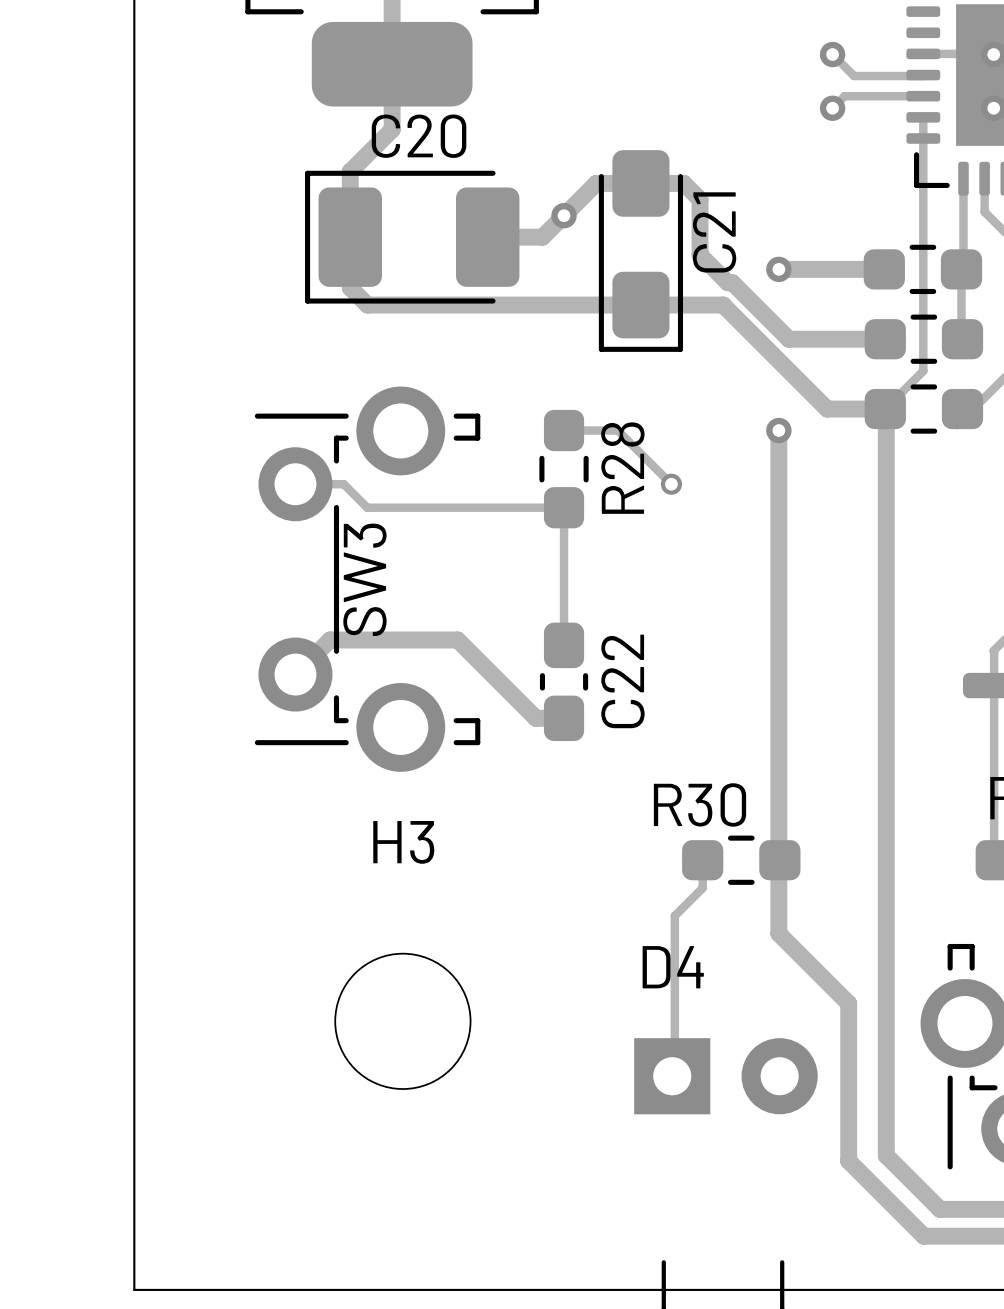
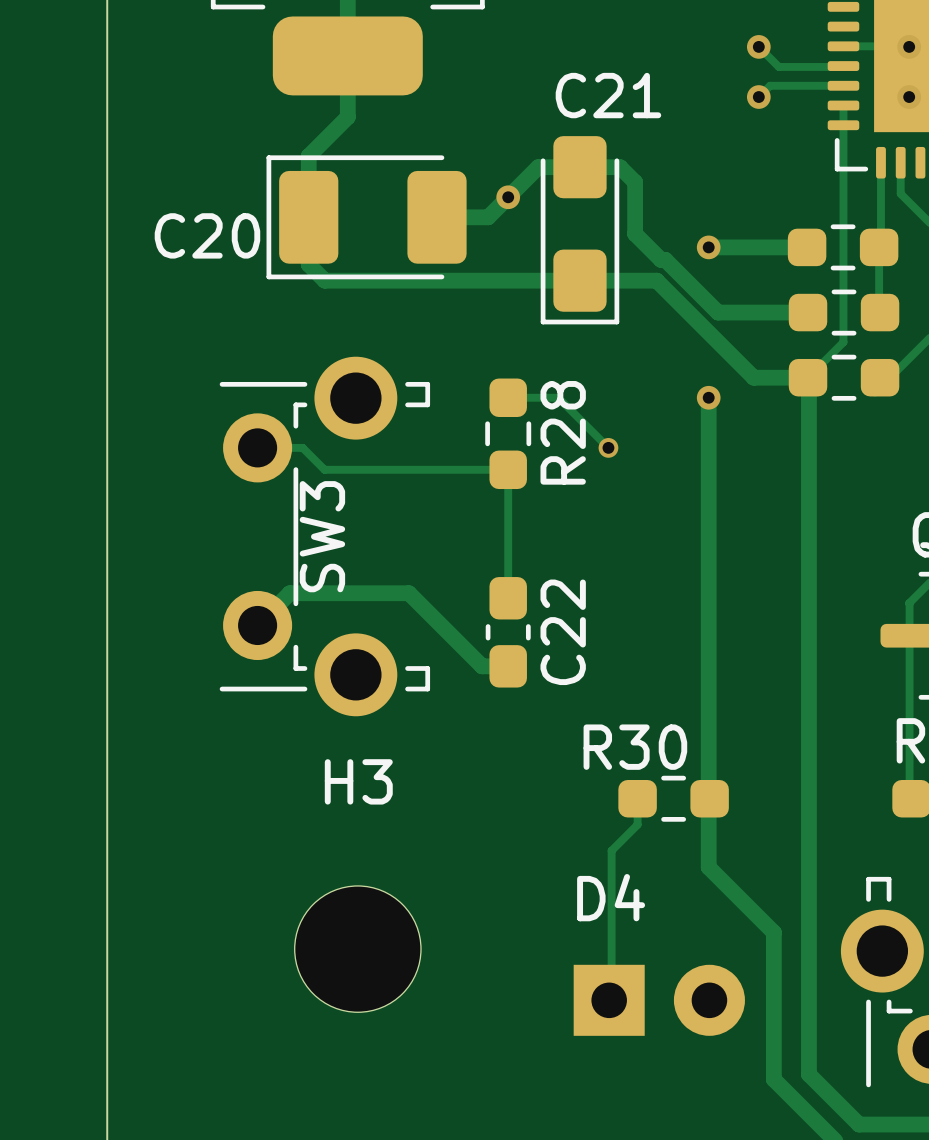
C20 name position: C20 (419, 136) -> C20 (207, 235)
C21 name rotation: 0° (714, 232) -> 90° clockwise (608, 95)

